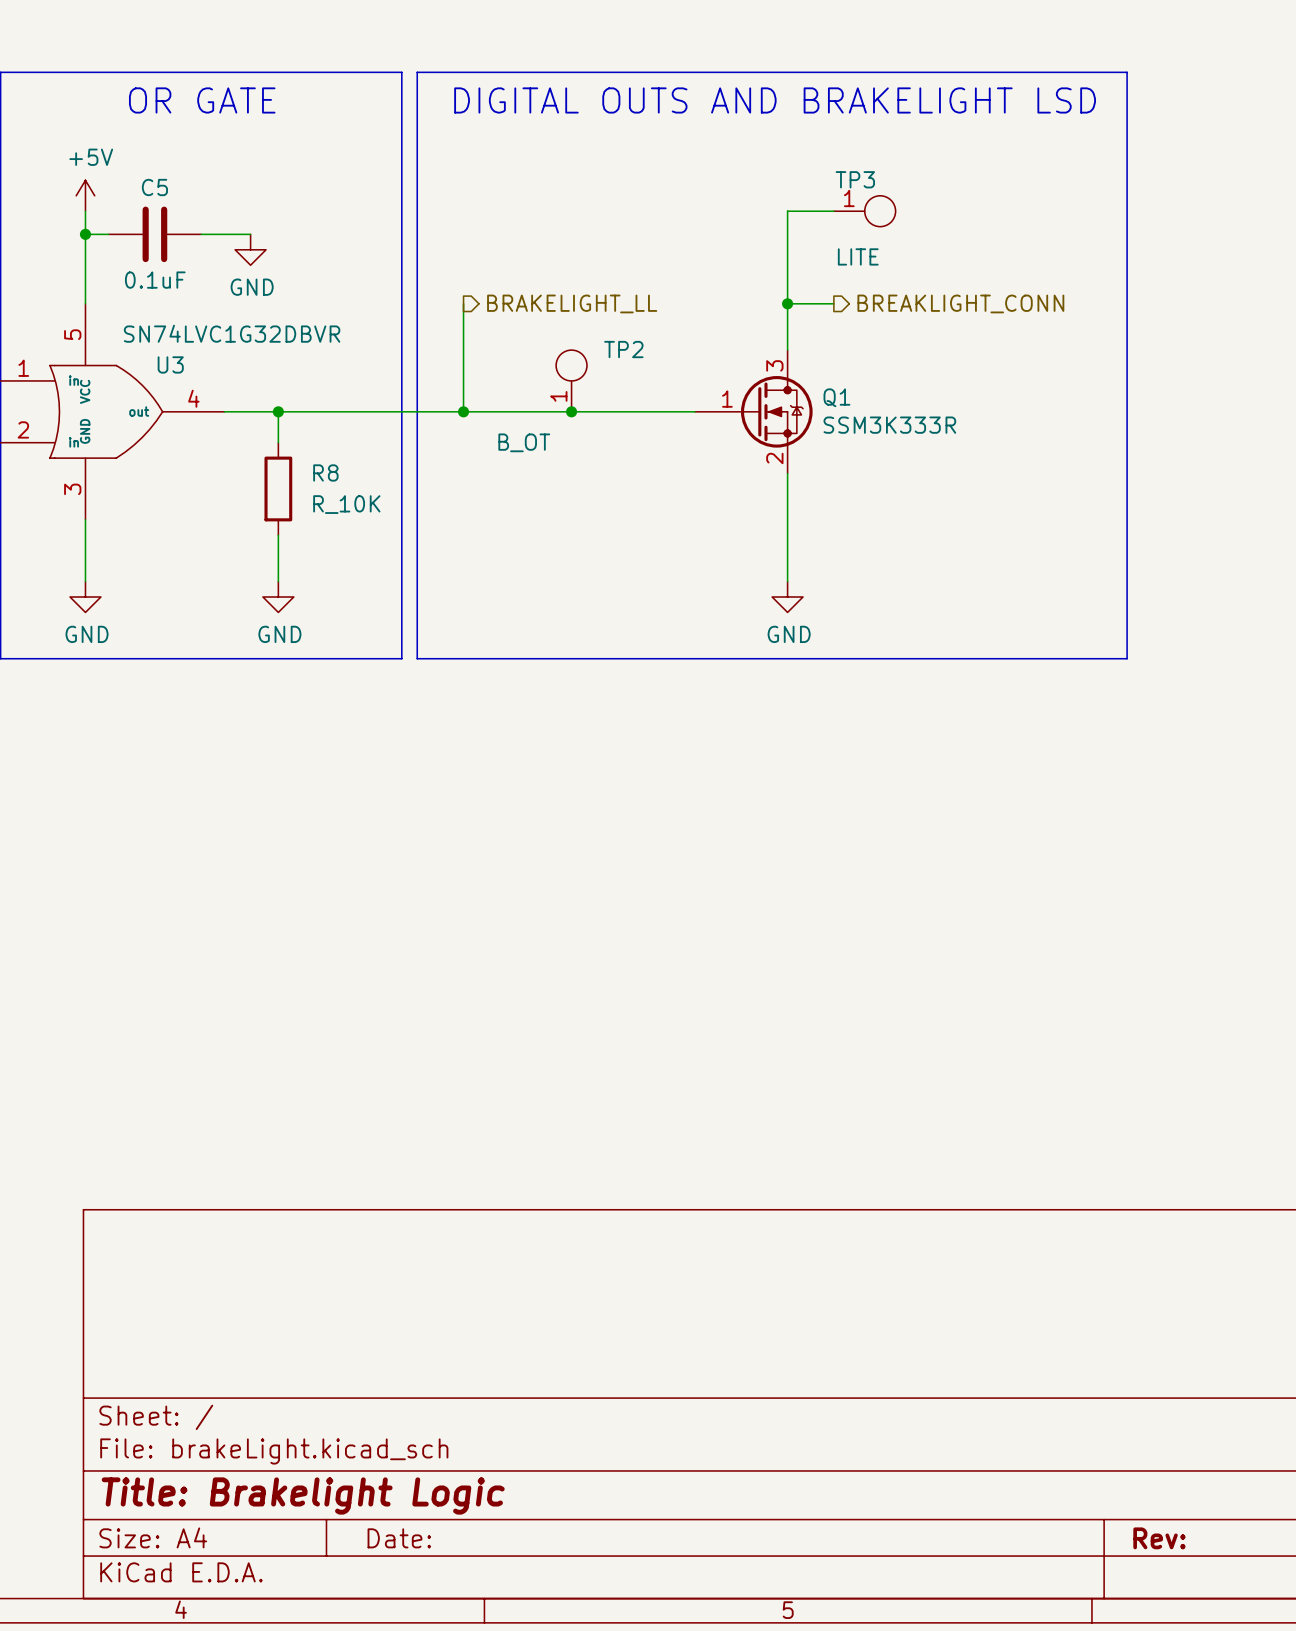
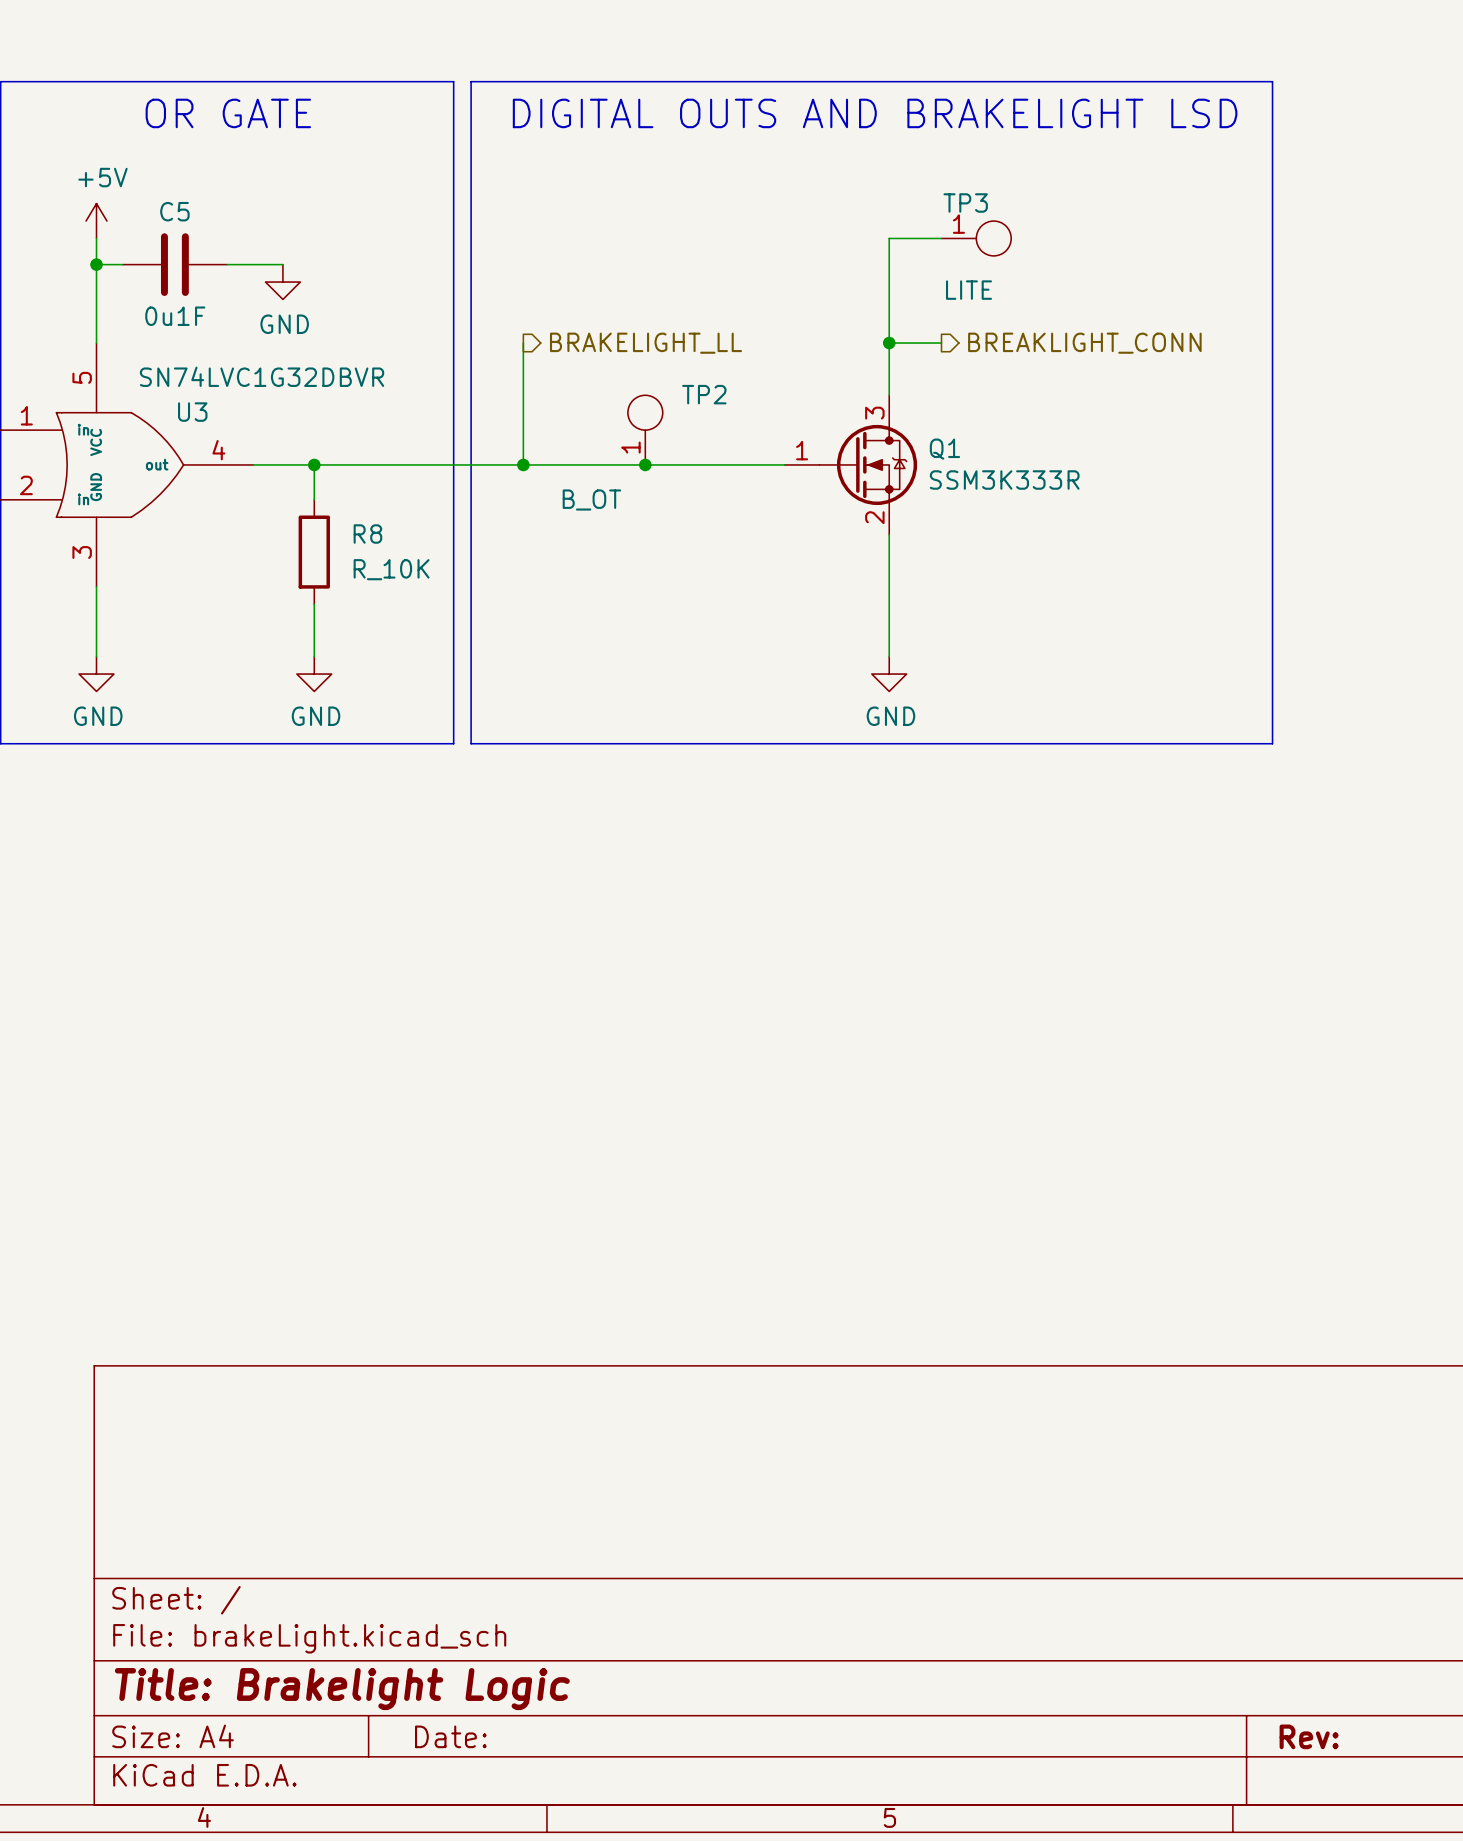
C5 value: 0.1uF (155, 280) -> 0u1F (175, 316)
Q1 symbol: [695, 350, 813, 474] -> [784, 395, 918, 535]

